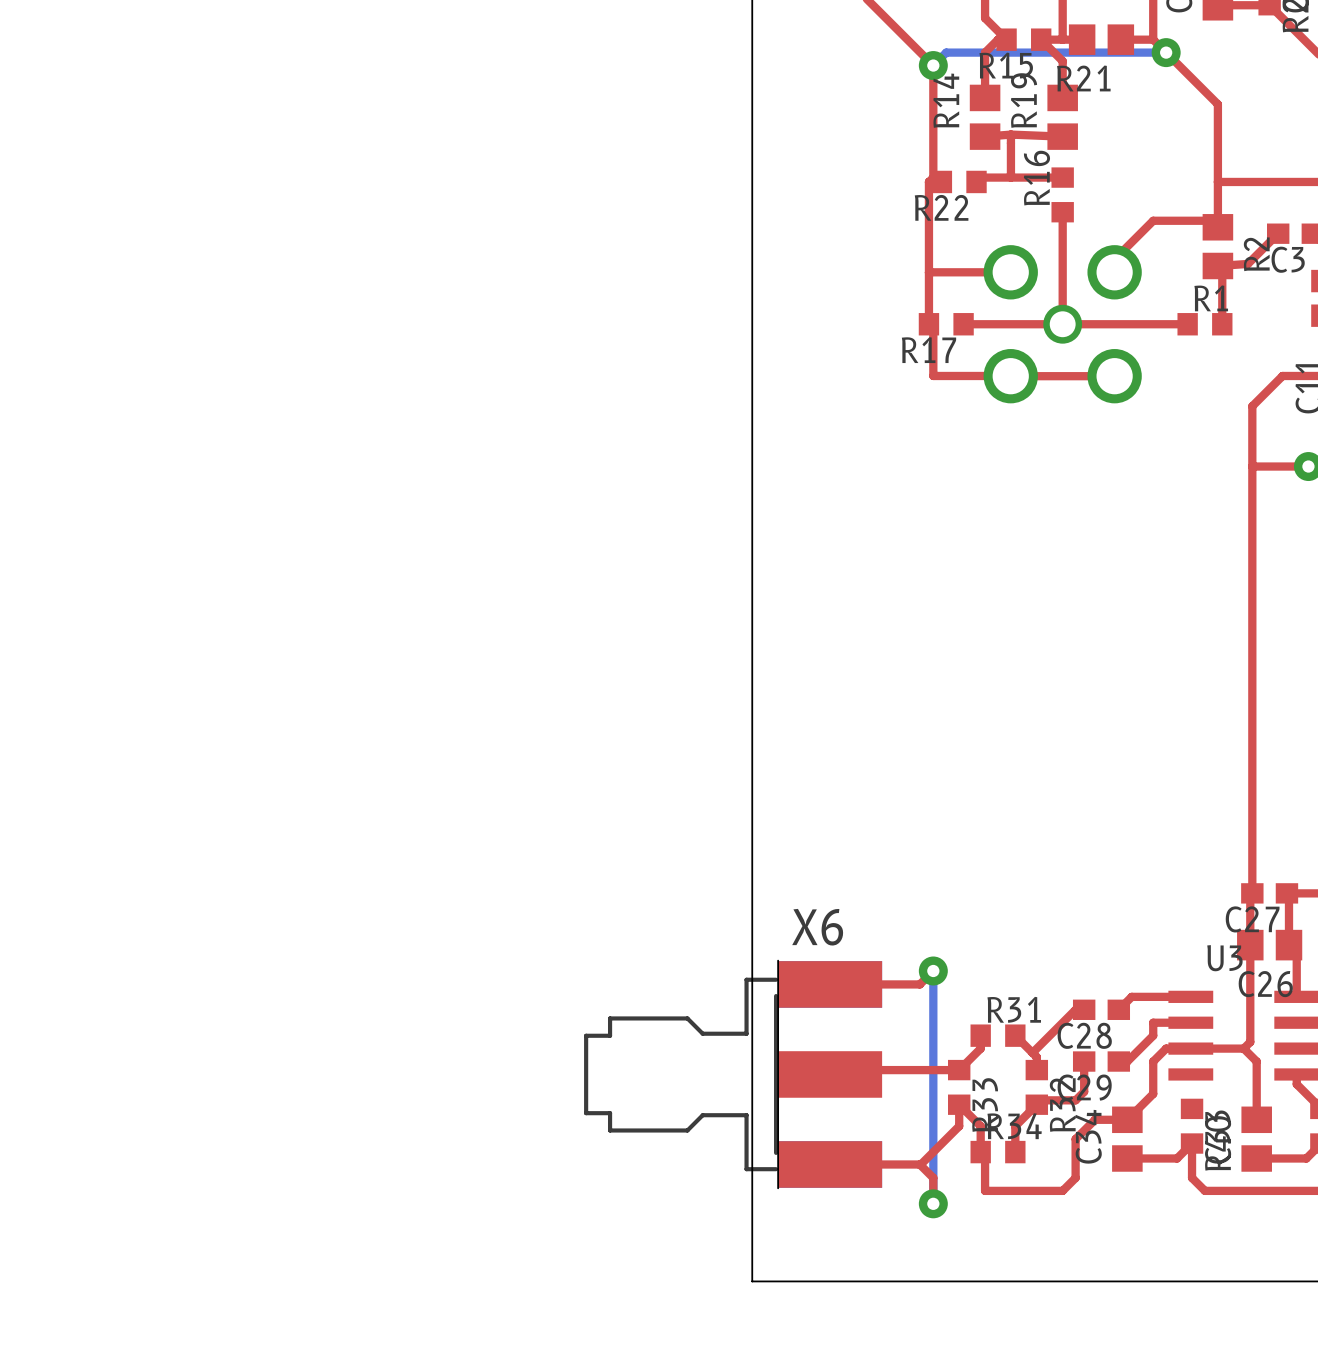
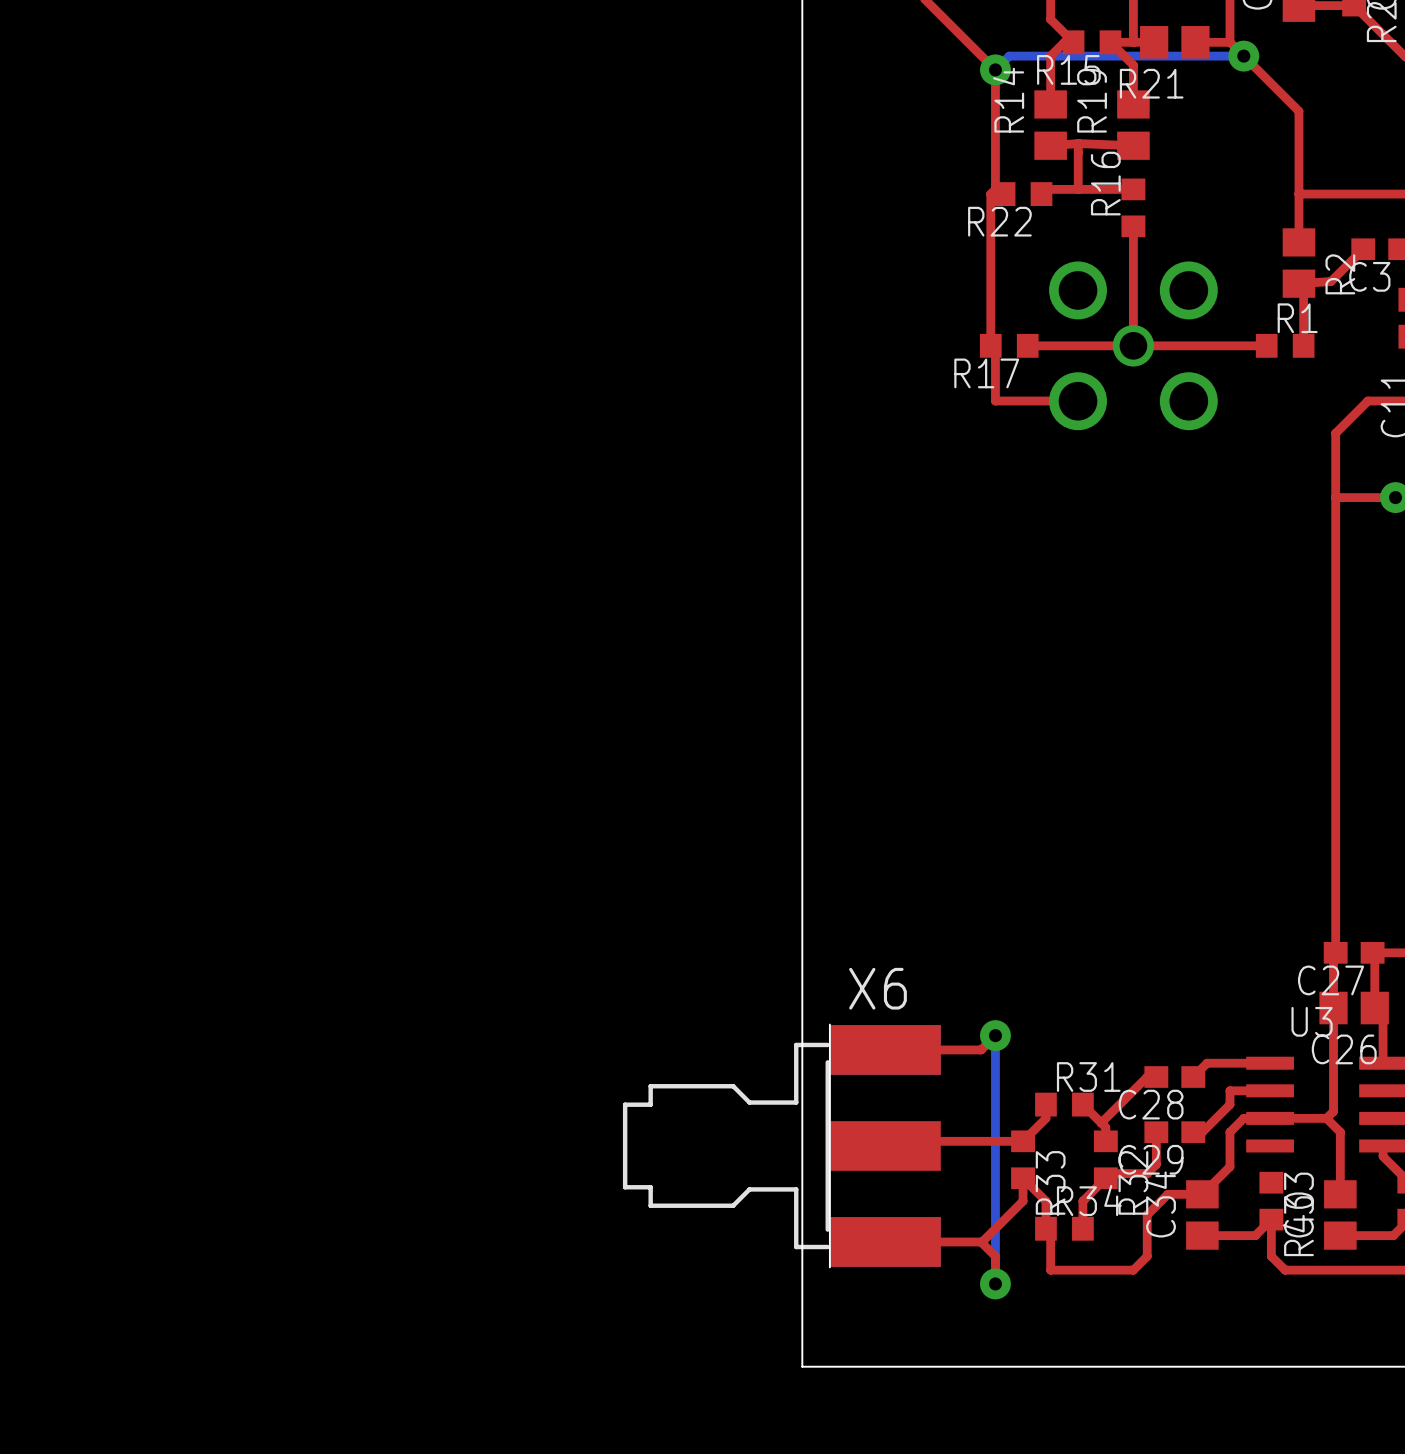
top track: (1217, 227) (1211, 220) (1153, 220) (1114, 259) (1114, 272) -> none
top track: (929, 272) (1010, 272) -> none
top track: (1010, 376) (1114, 376) -> none

